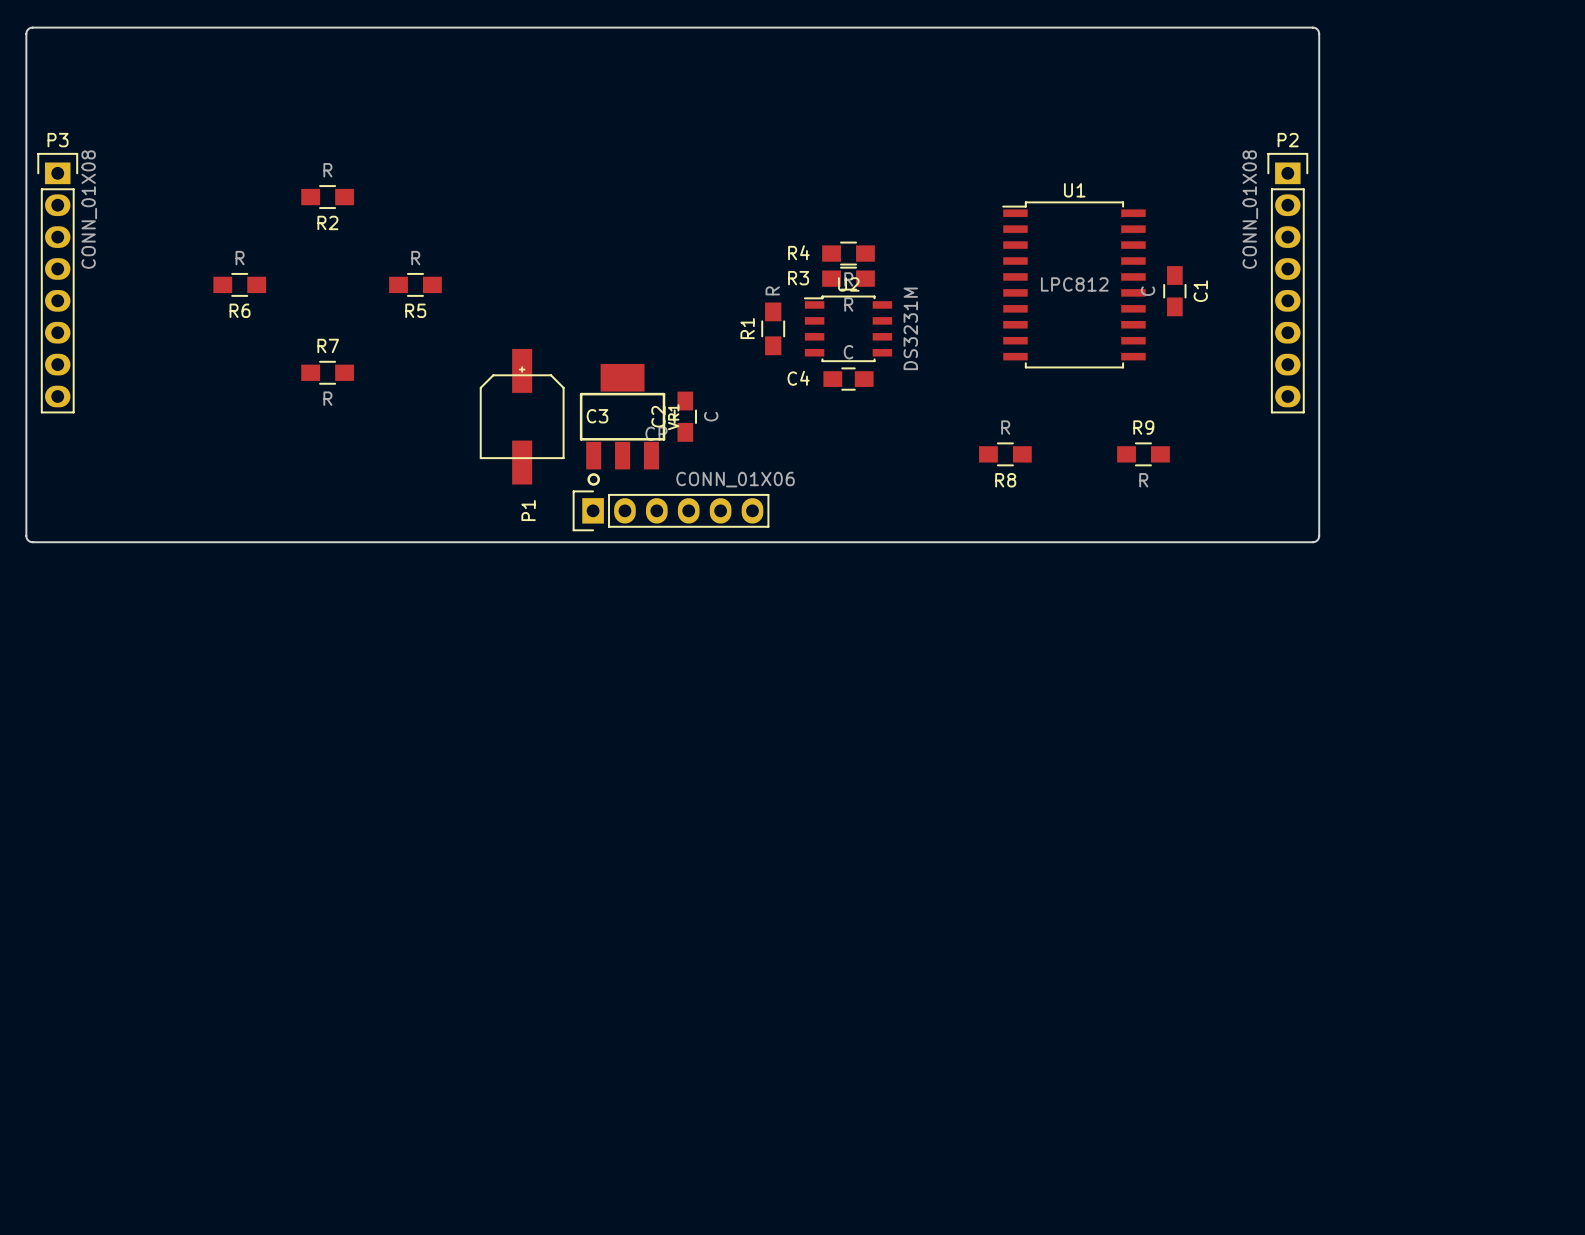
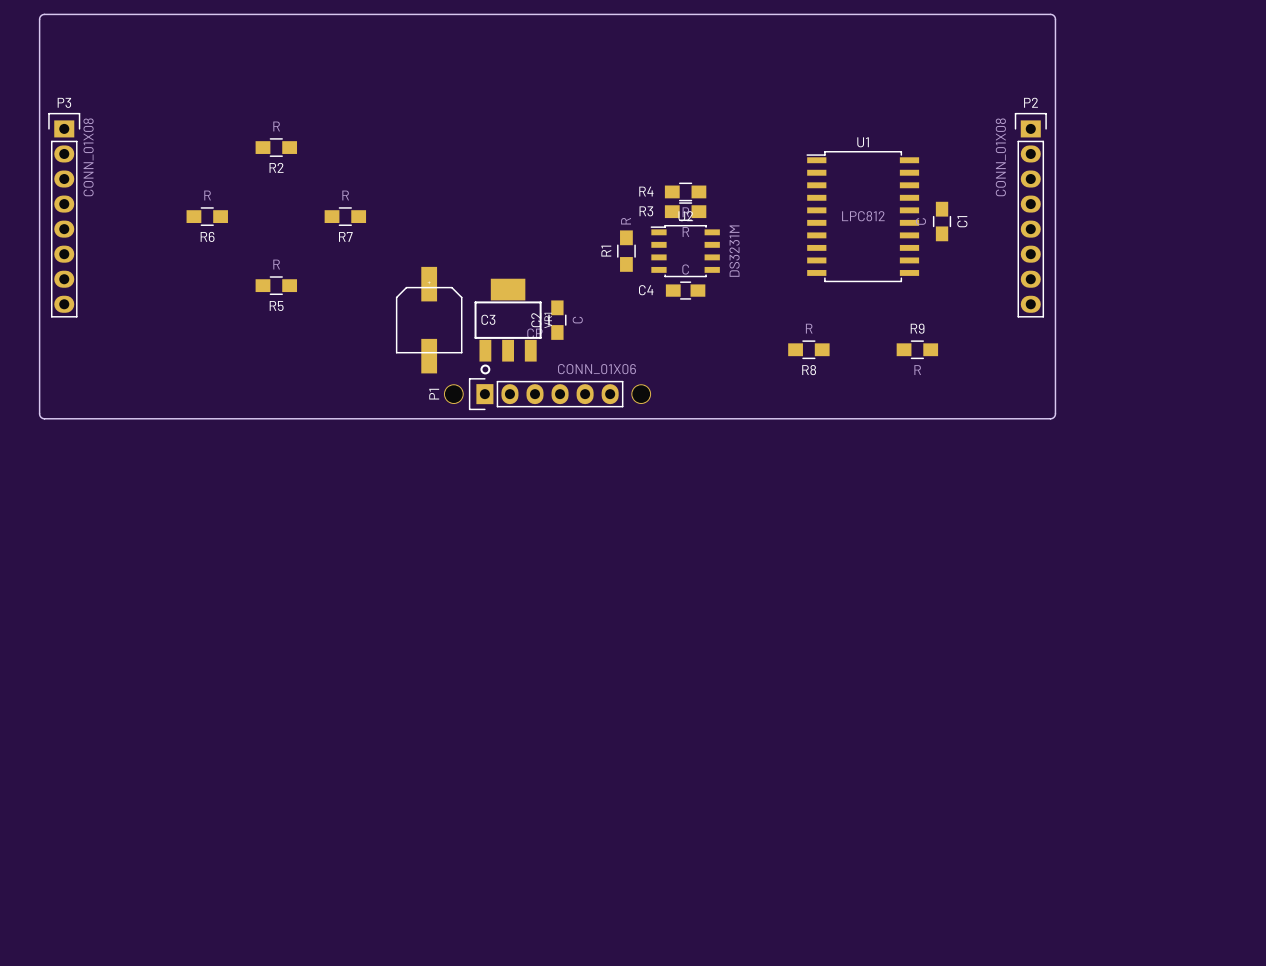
R5 name: R5 (415, 310) -> R7 (345, 236)
R7 name: R7 (328, 345) -> R5 (276, 306)
R7 value position: R (327, 398) -> R (276, 264)
part: none -> (453, 394)
part: none -> (641, 394)

